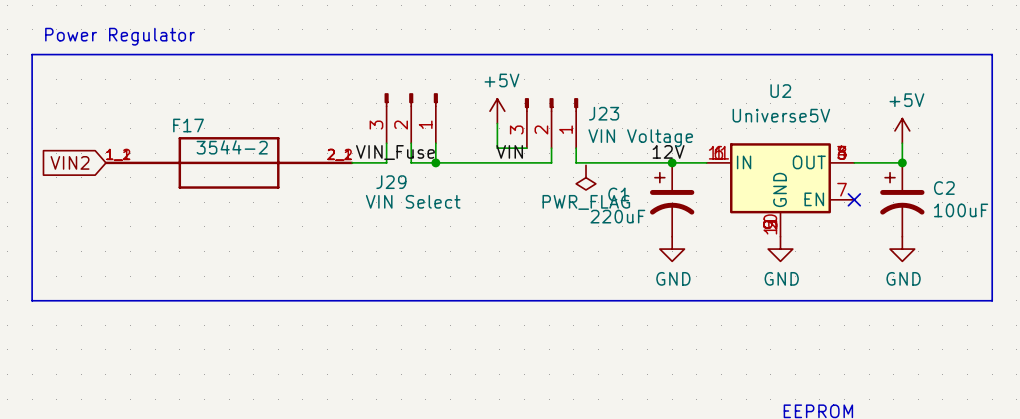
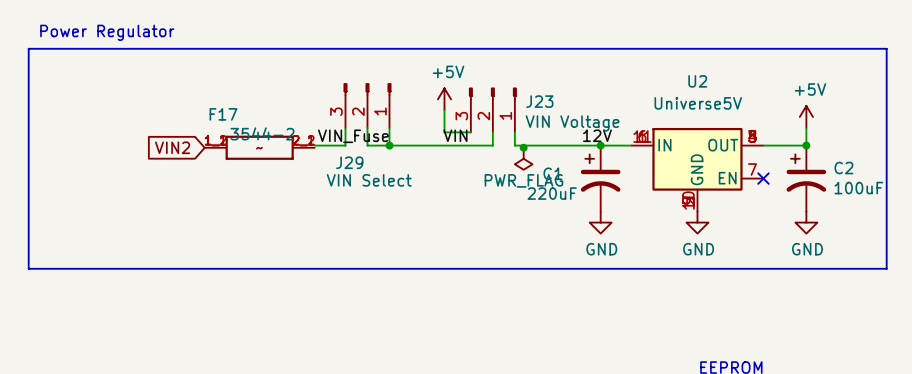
F17 symbol: [104, 137, 354, 189] -> [204, 135, 315, 160]
global label position: VIN2 (70, 162) -> VIN2 (172, 147)
junction: none -> (523, 147)

